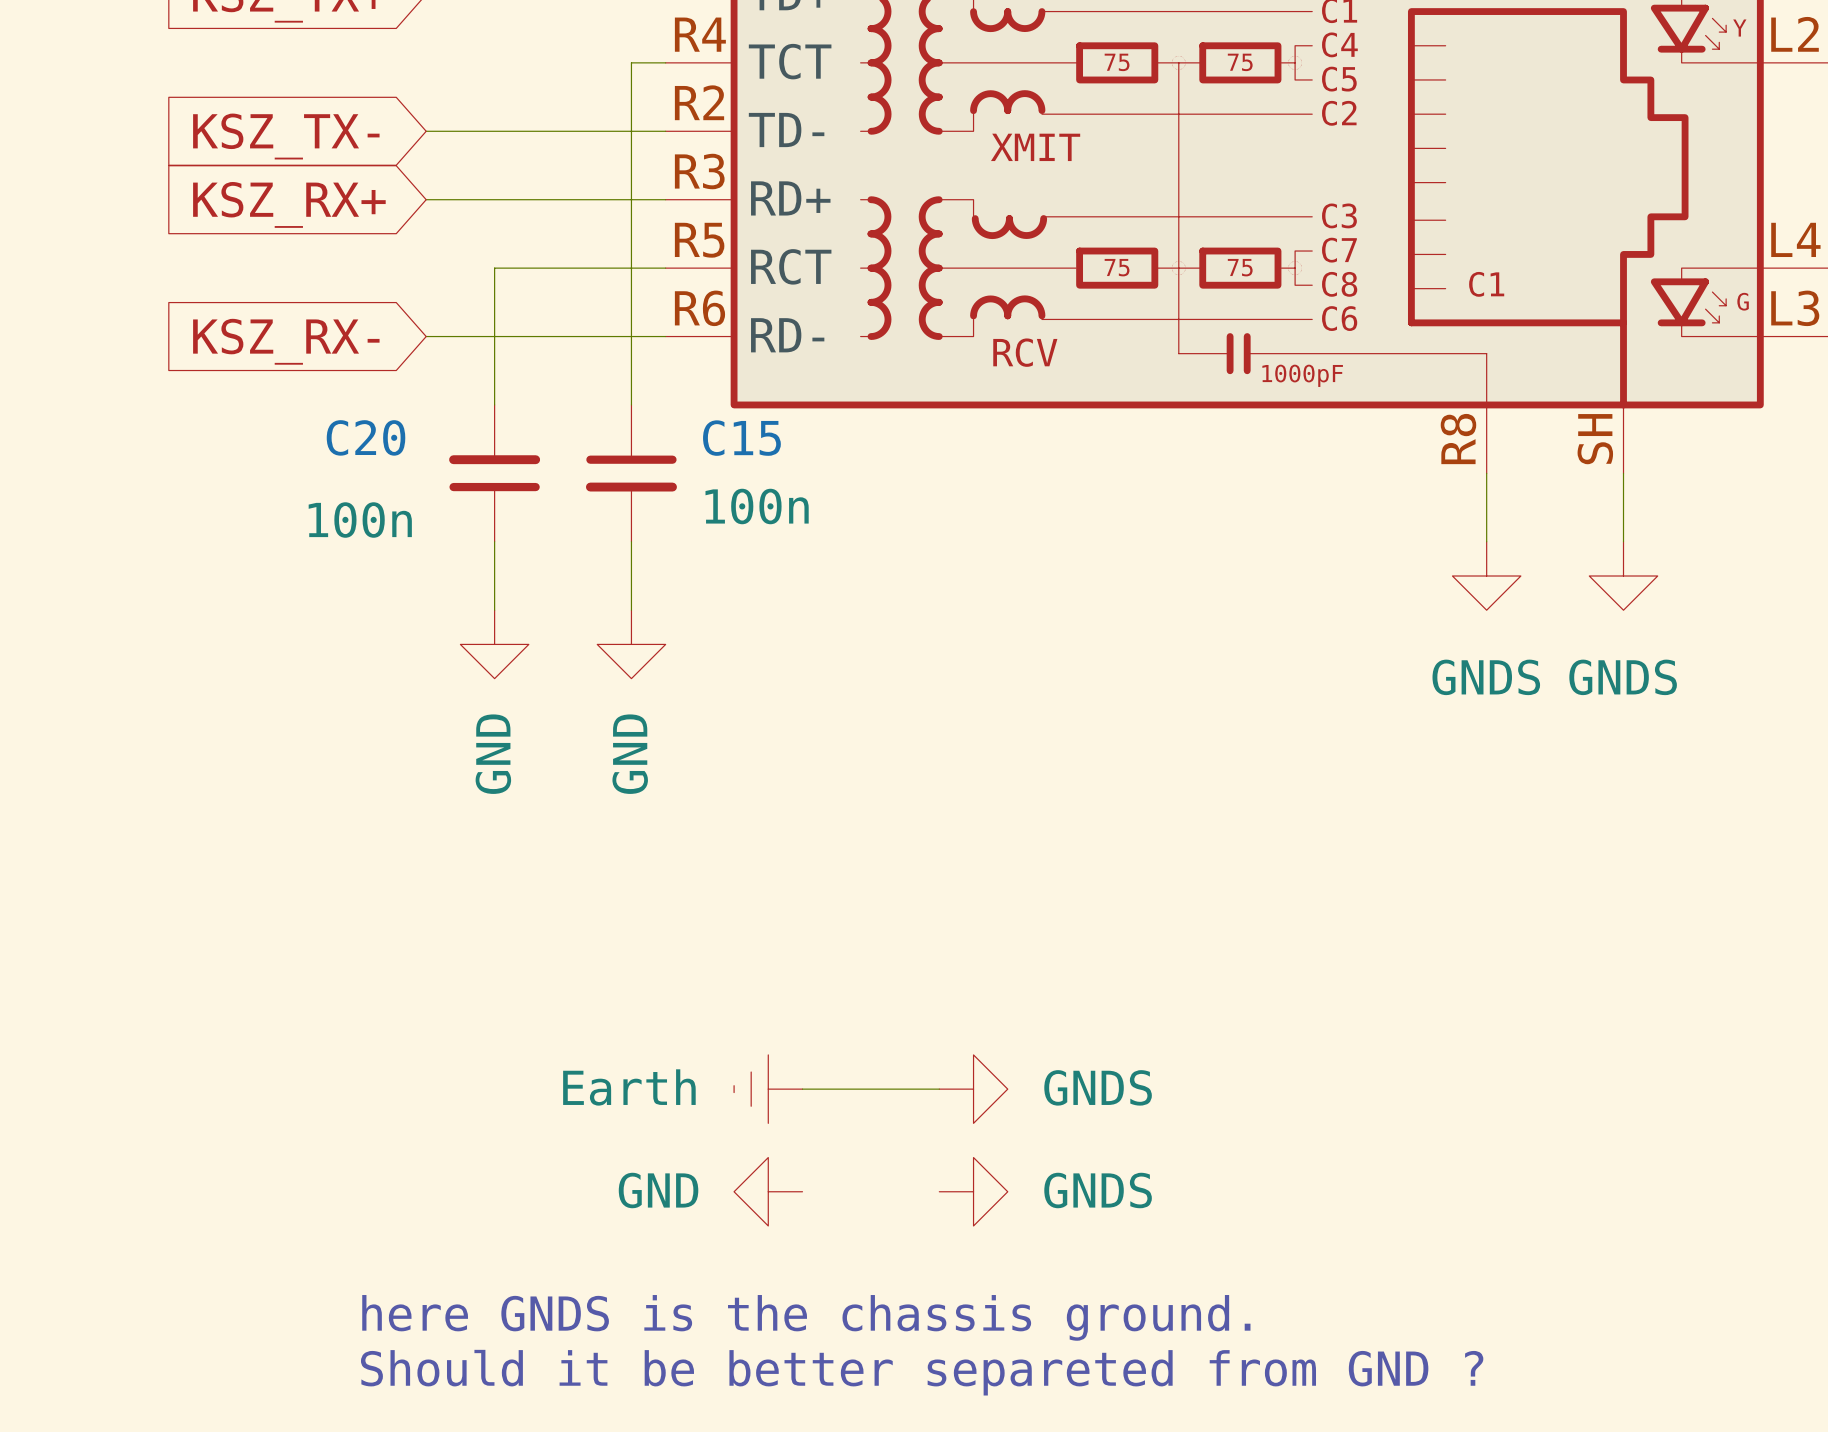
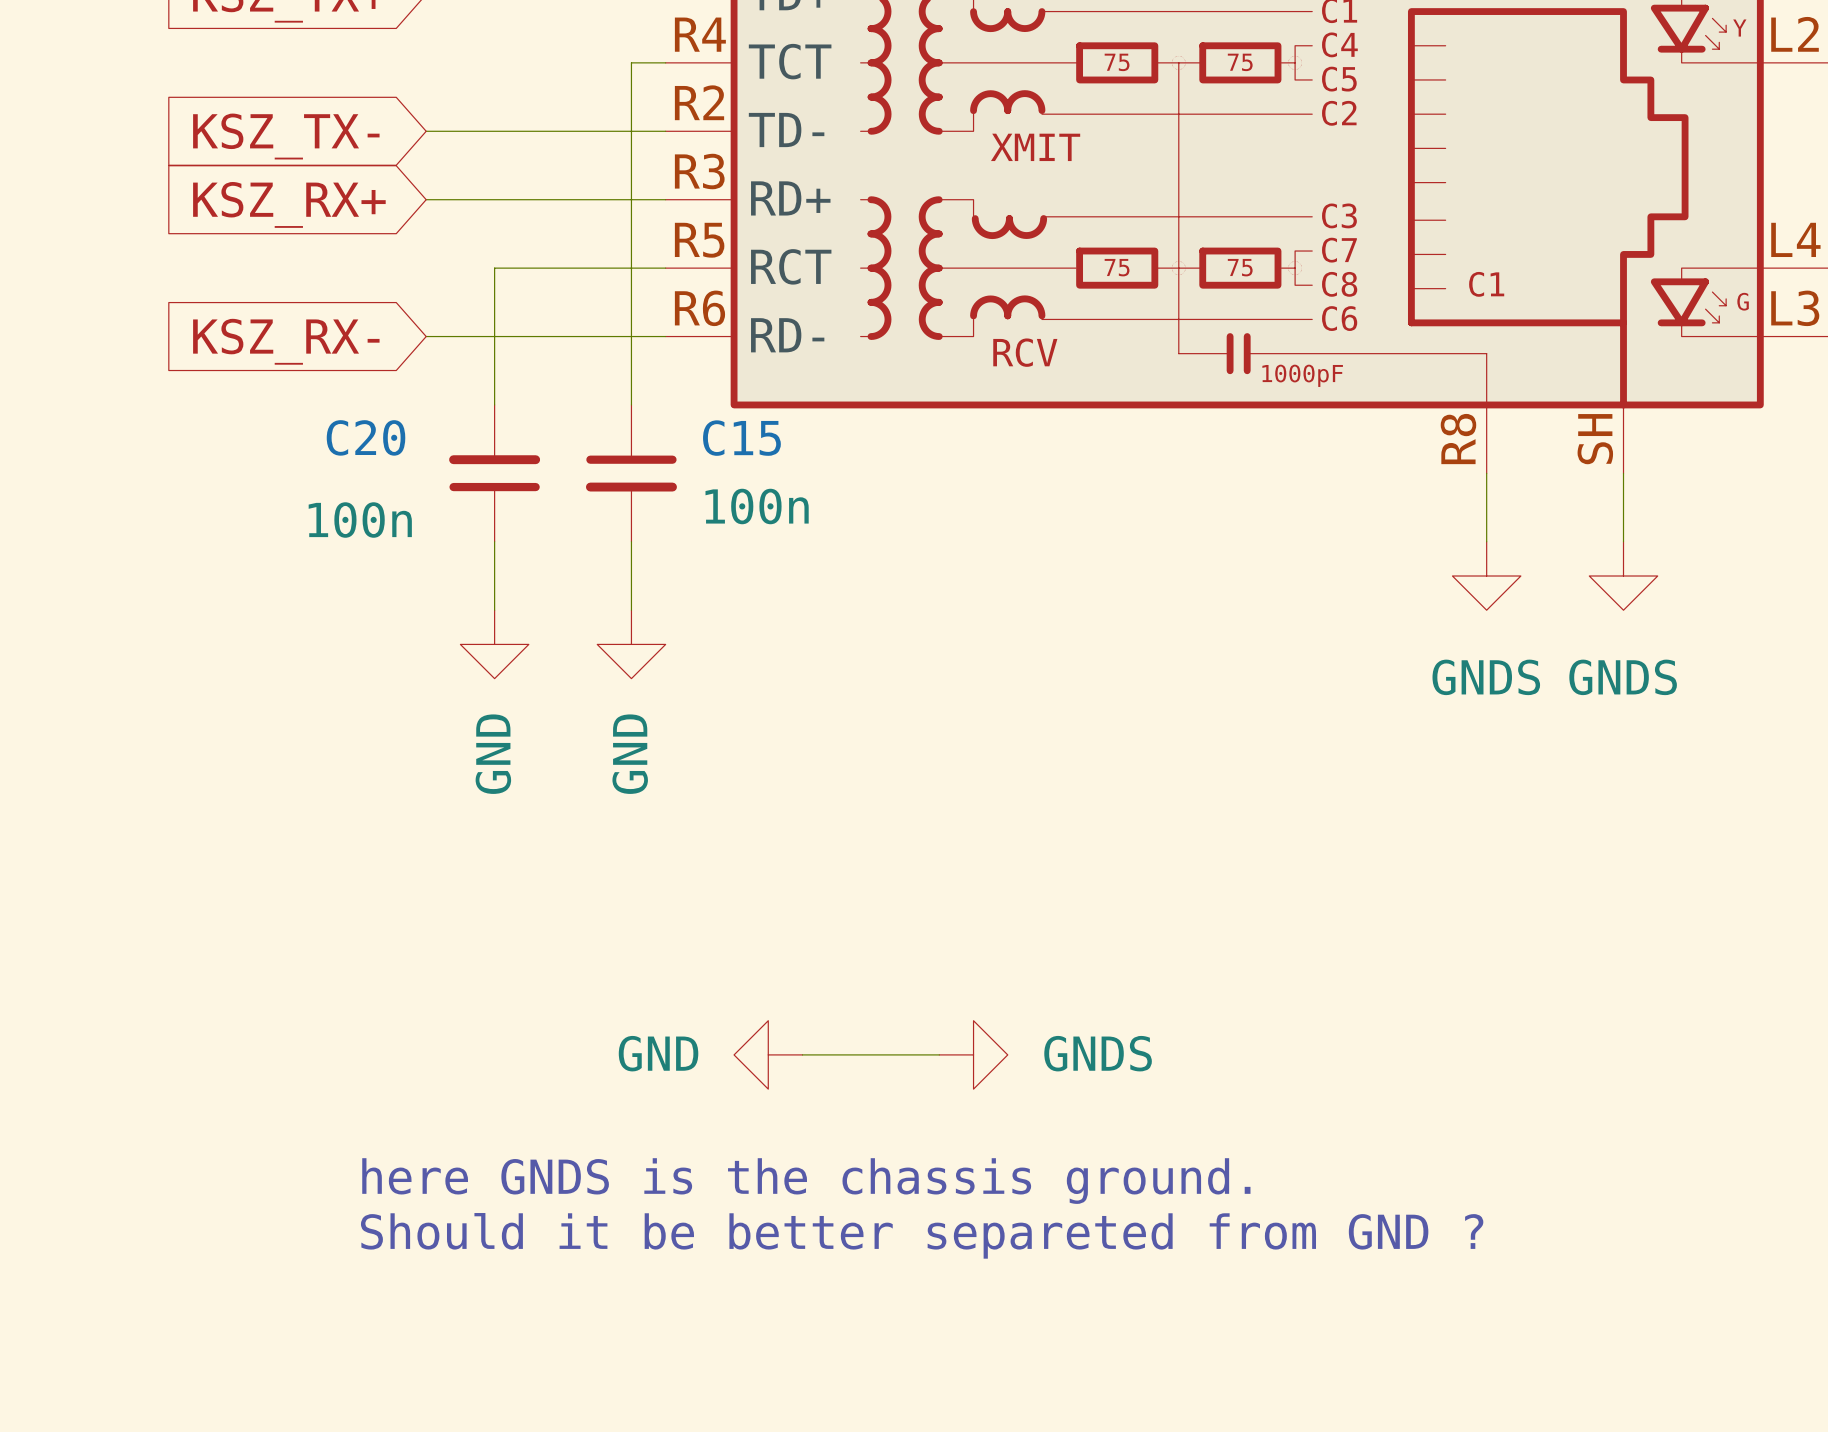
power symbol: Earth (768, 1089) -> none
wire: (802, 1089) (939, 1089) -> (802, 1054) (939, 1054)
power symbol position: GNDS (973, 1089) -> GNDS (973, 1054)
power symbol position: GND (768, 1191) -> GND (768, 1054)
power symbol: GNDS (973, 1191) -> none
text position: here GNDS is the chassis ground. (806, 1317) -> here GNDS is the chassis ground. (806, 1181)
text position: Should it be better separeted from GND ? (922, 1372) -> Should it be better separeted from GND ? (922, 1235)

